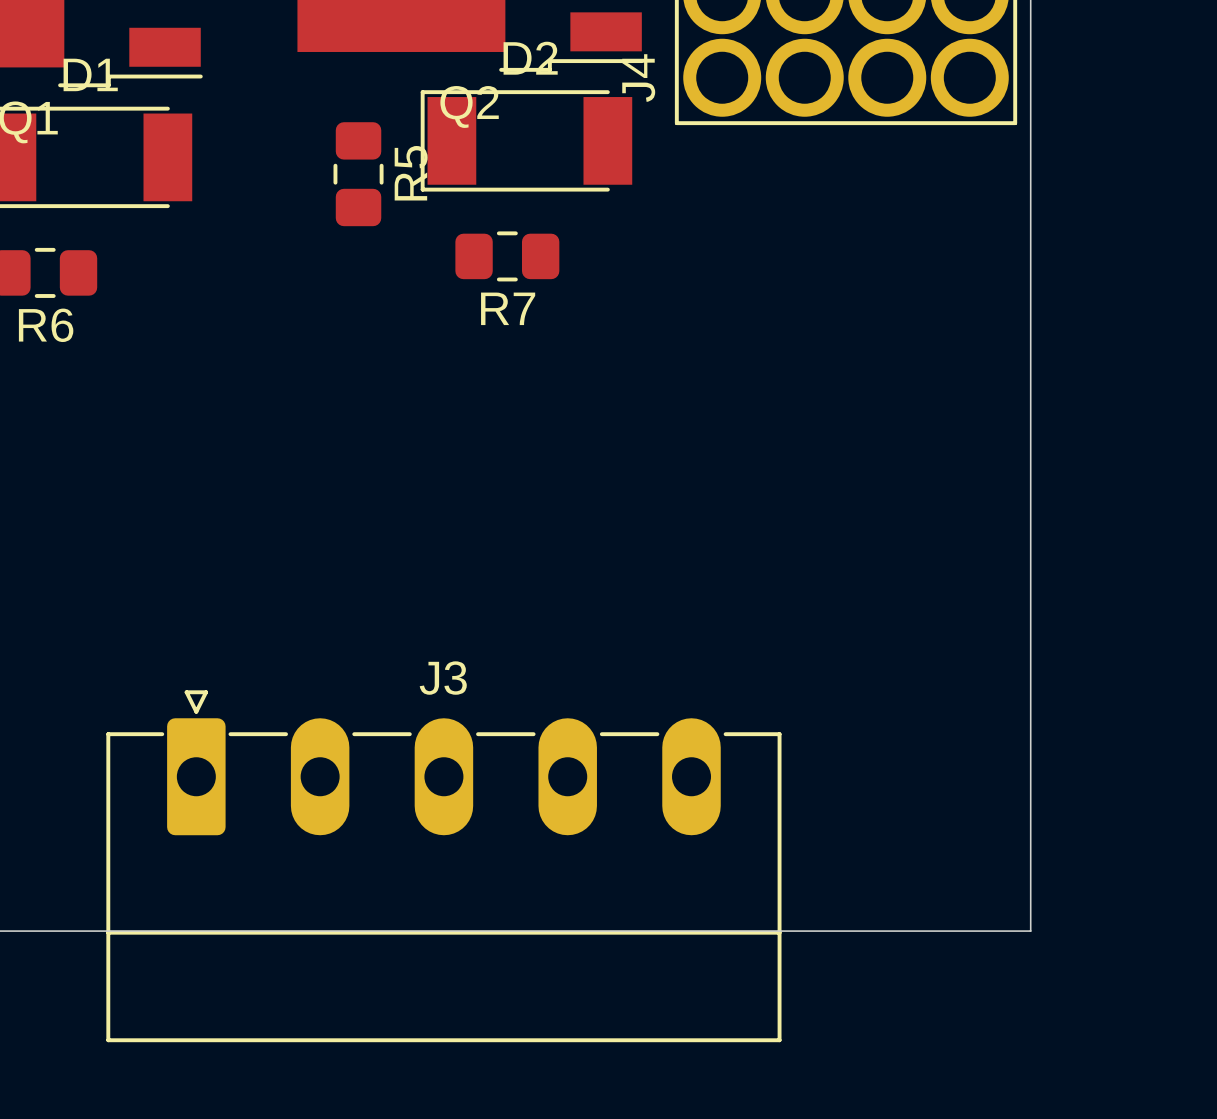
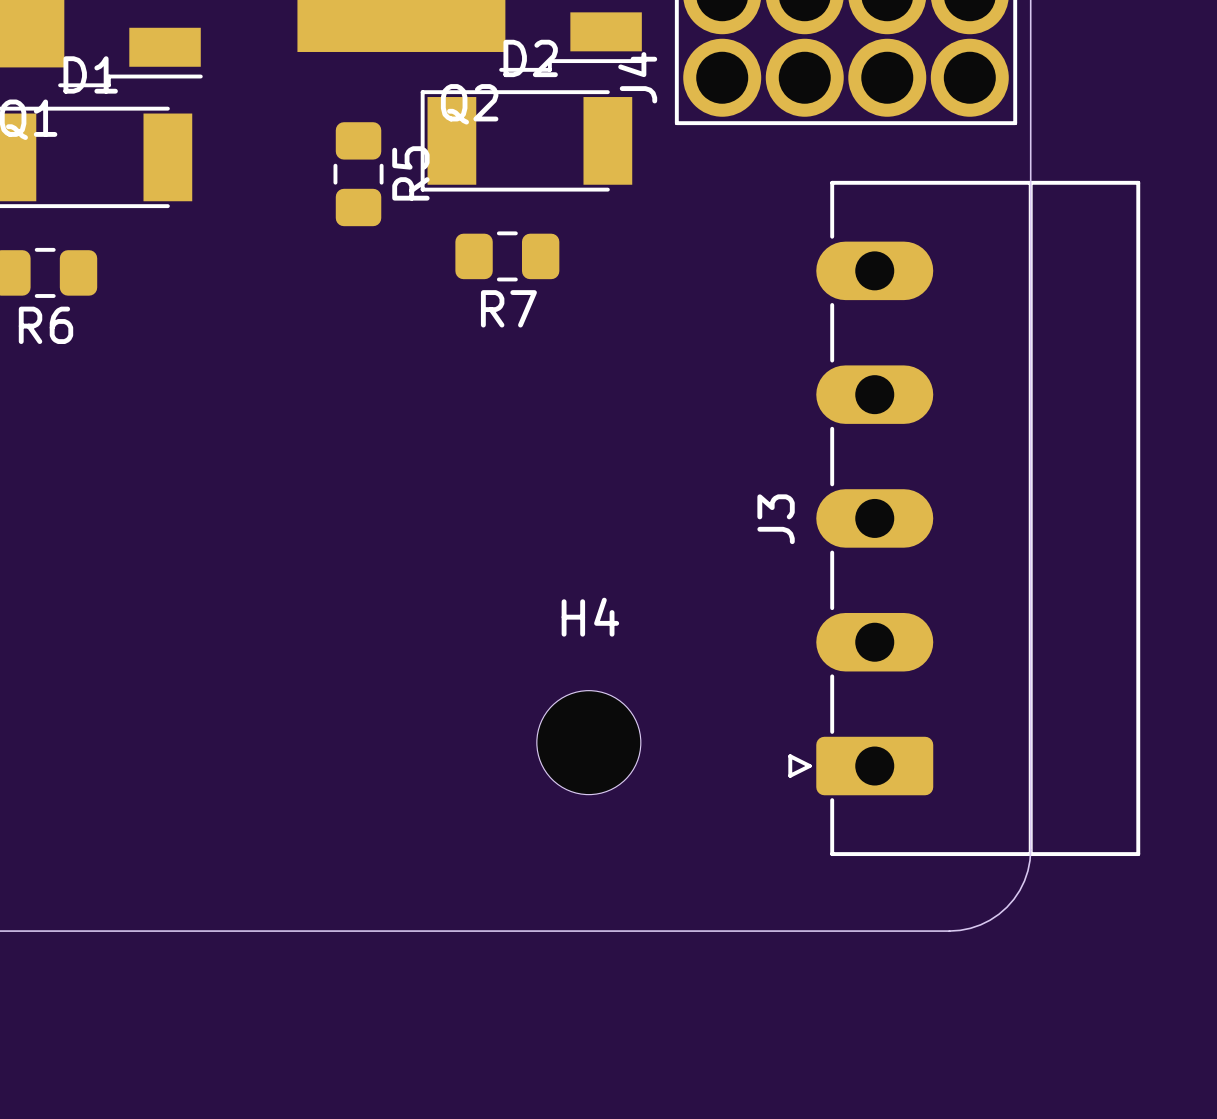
H4: none -> (588, 742)
board edge: (1030, 849) (1030, 931) (949, 931) -> (1030, 849) (1024, 880) (1006, 907) (980, 924) (949, 931)
J3 rotation: 0° (443, 866) -> 90° counterclockwise (964, 518)
J3 position: (443, 866) -> (964, 518)

